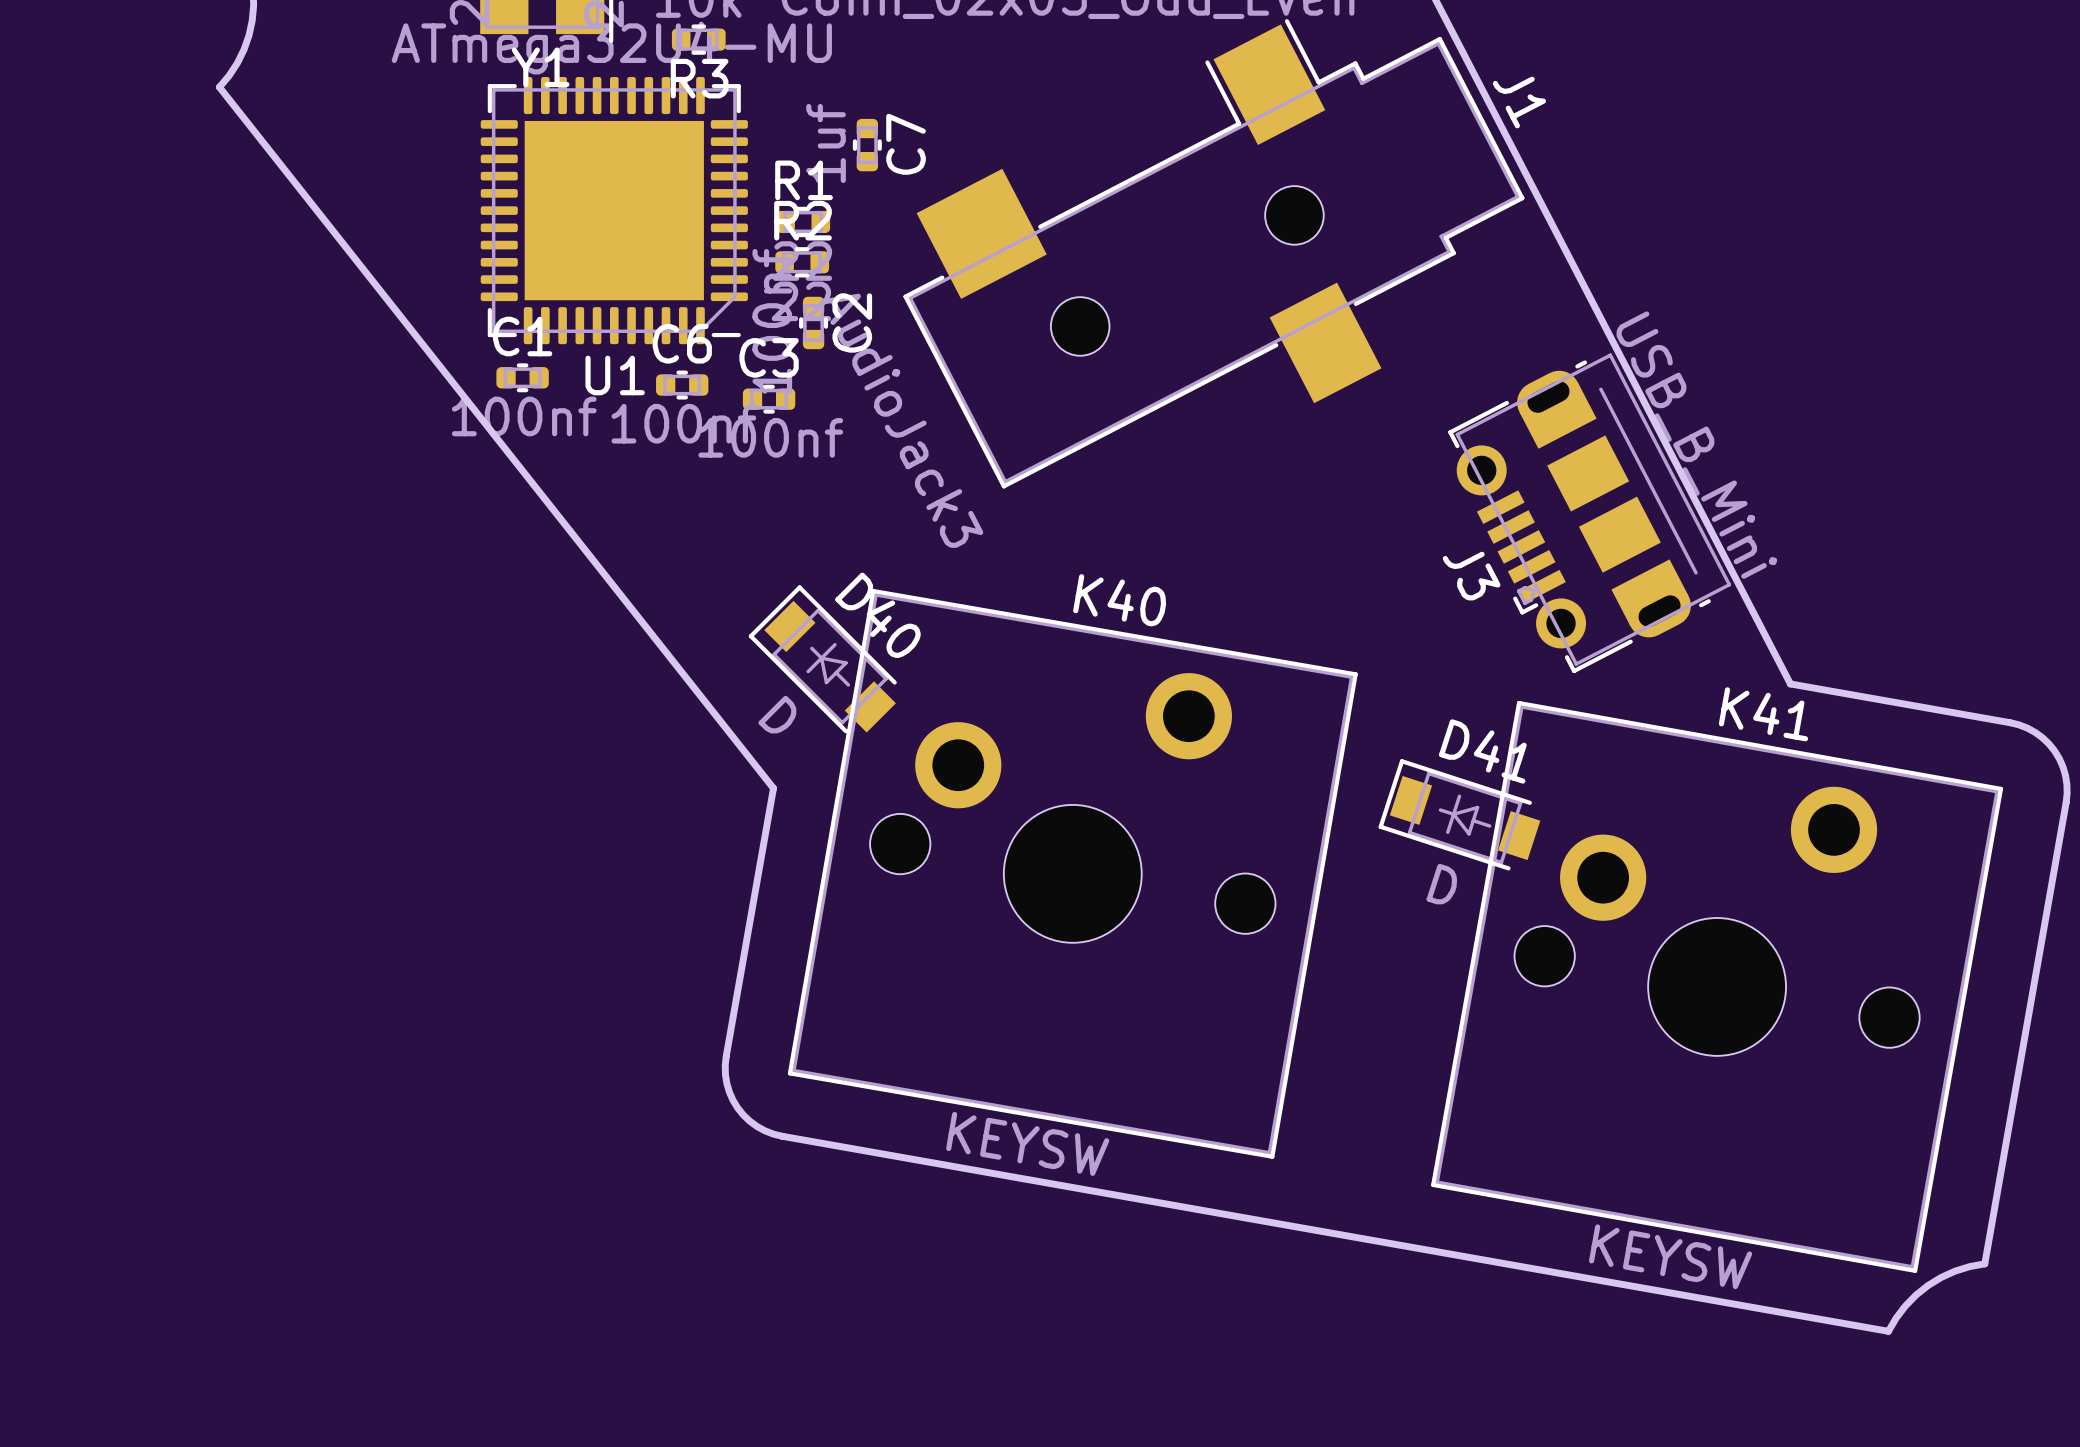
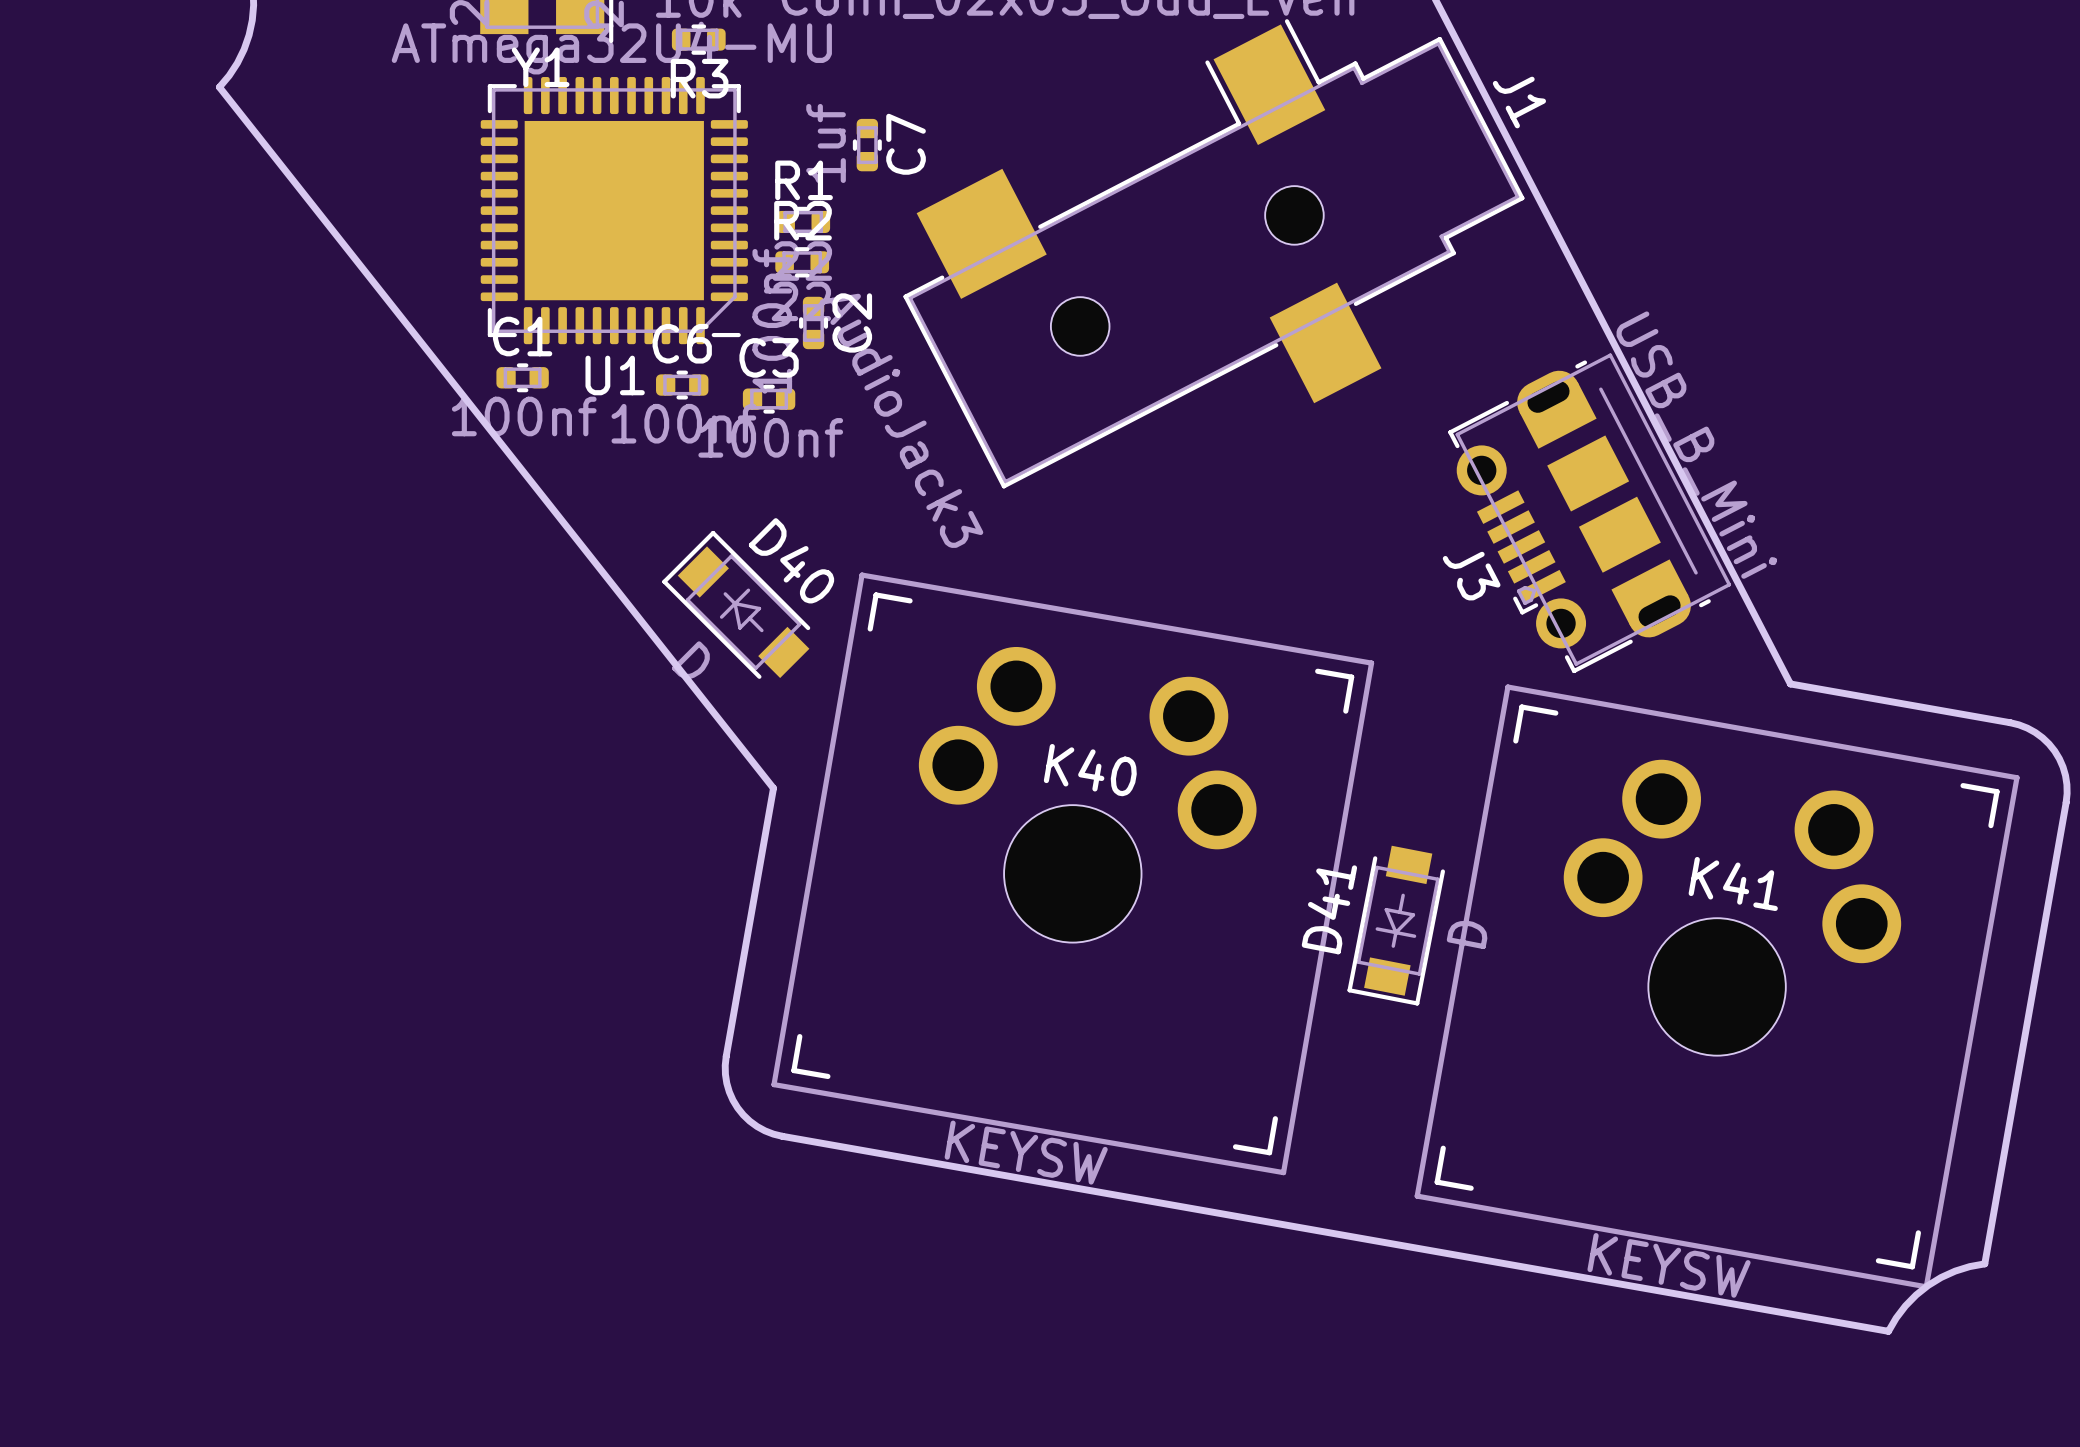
K40 footprint: [787, 588, 1358, 1159] -> [771, 572, 1375, 1176]
K40 name position: K40 (1119, 600) -> K40 (1090, 770)
D40 position: (822, 659) -> (736, 604)
K41 footprint: [1431, 700, 2004, 1273] -> [1414, 684, 2020, 1290]
K41 name position: K41 (1763, 714) -> K41 (1733, 883)
D41 rotation: 0° (1459, 814) -> 97° counterclockwise (1396, 925)
D41 position: (1459, 814) -> (1396, 925)

